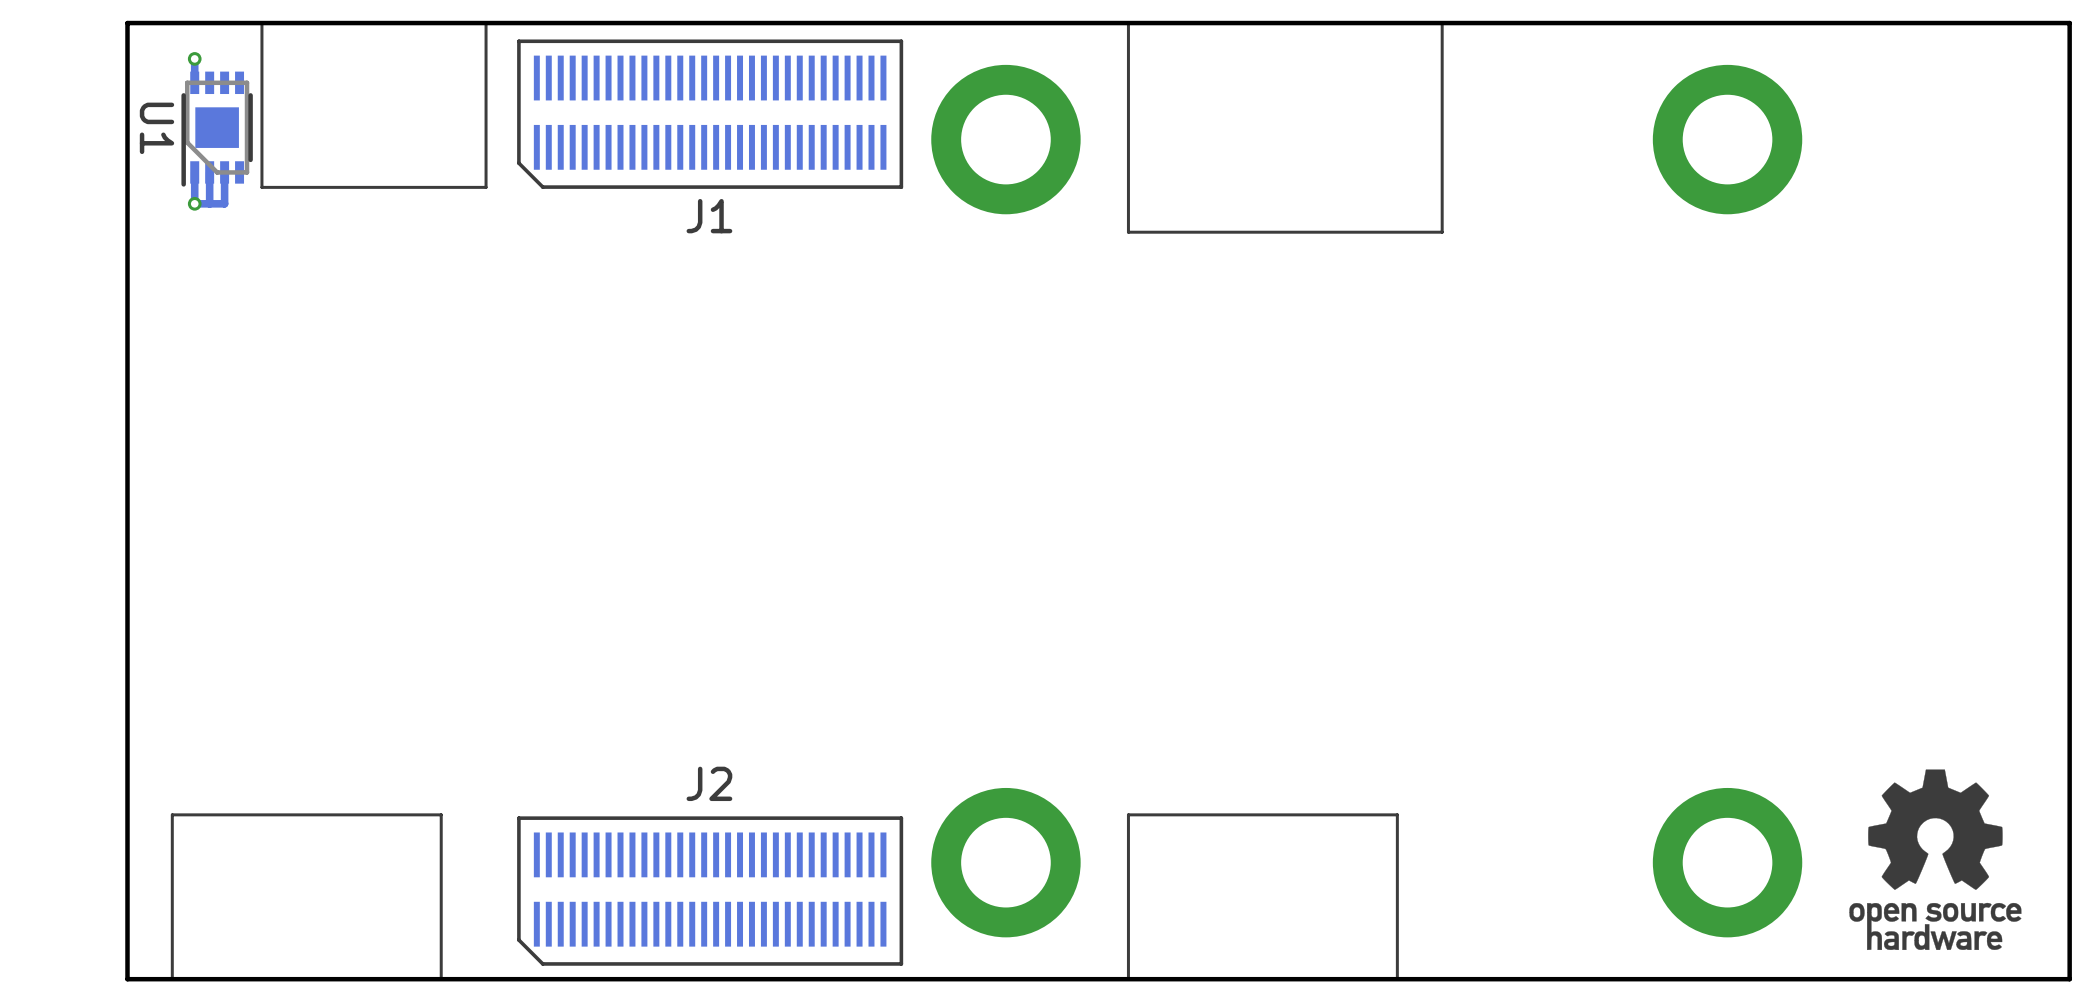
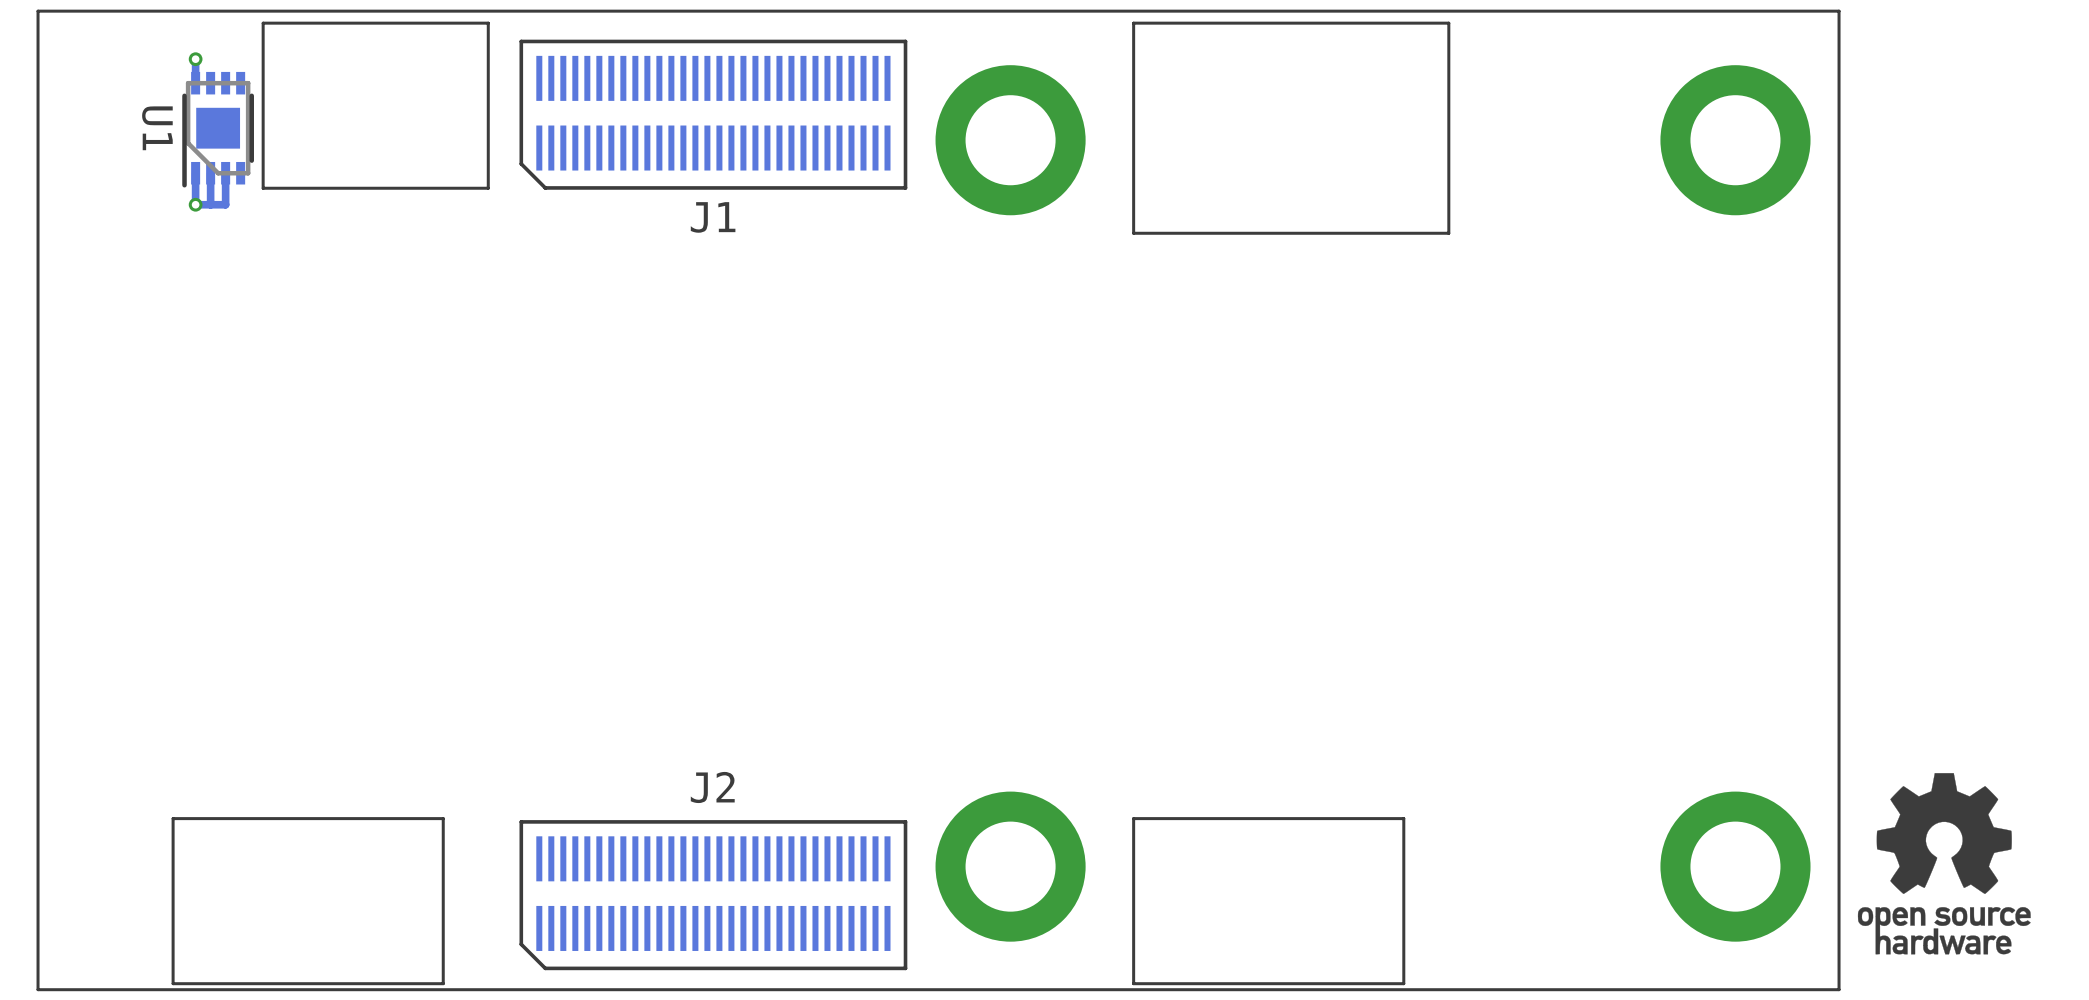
line: none -> (1839, 11) (1839, 989) (38, 989) (38, 11) (1839, 11)
board edge: (2069, 23) (2069, 979) (127, 979) (127, 23) (2069, 23) -> none

